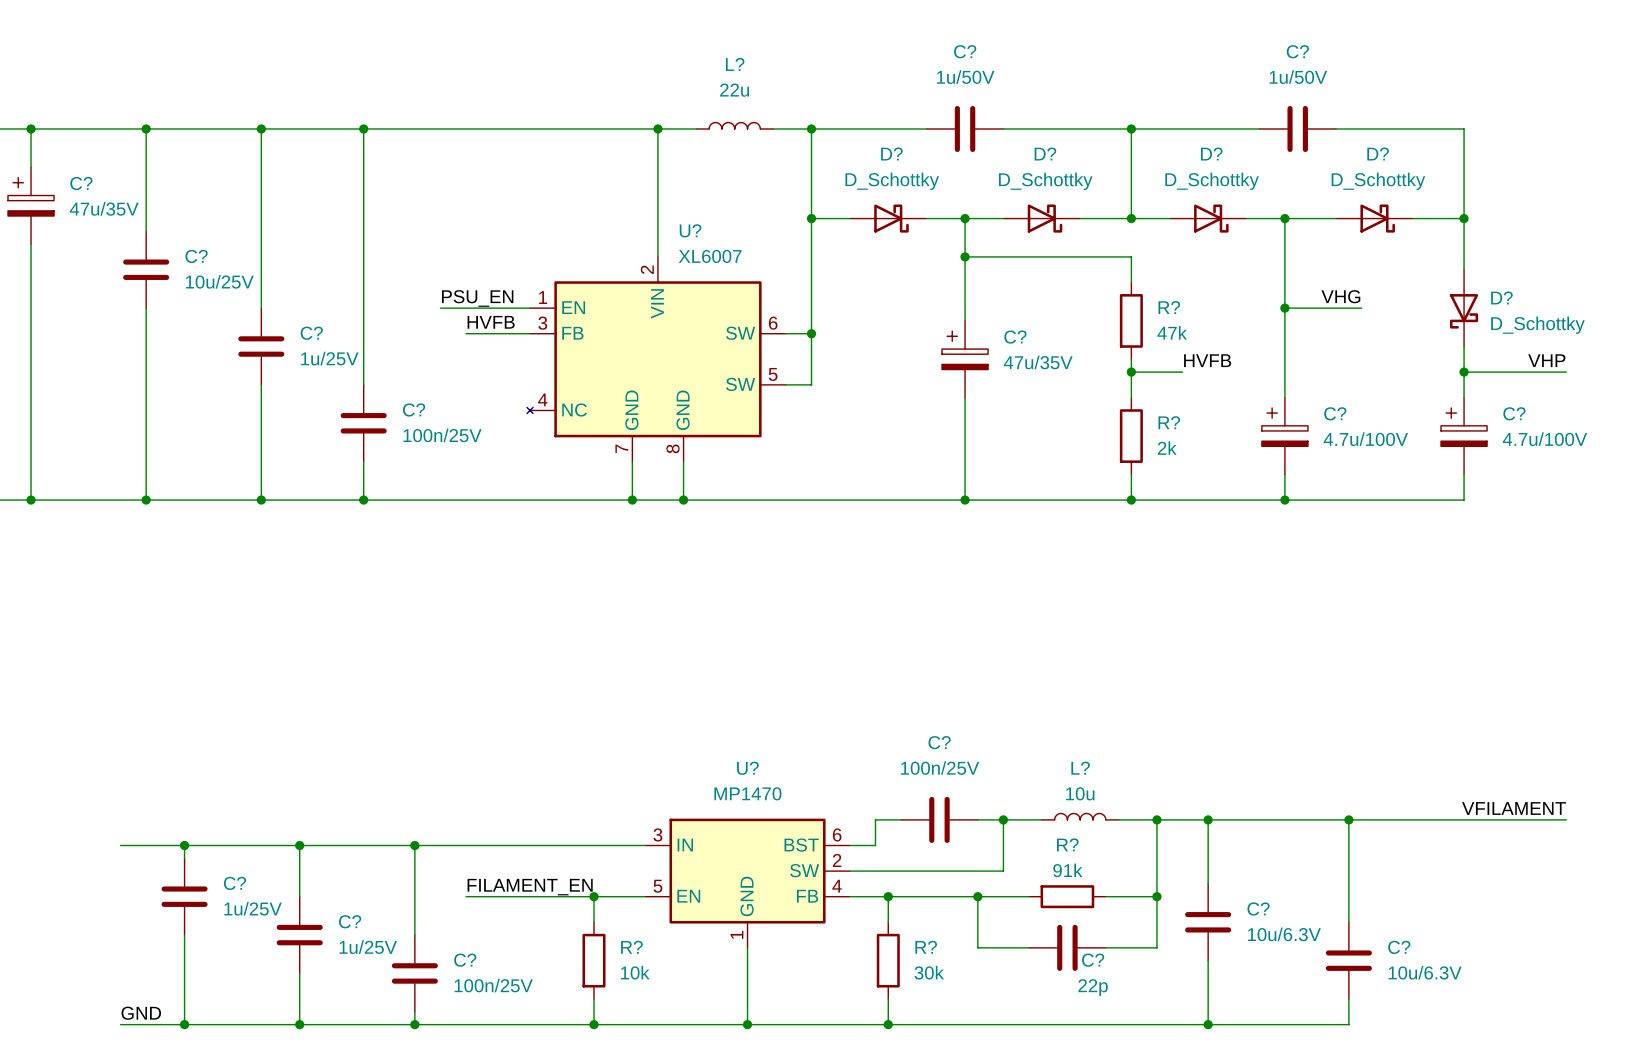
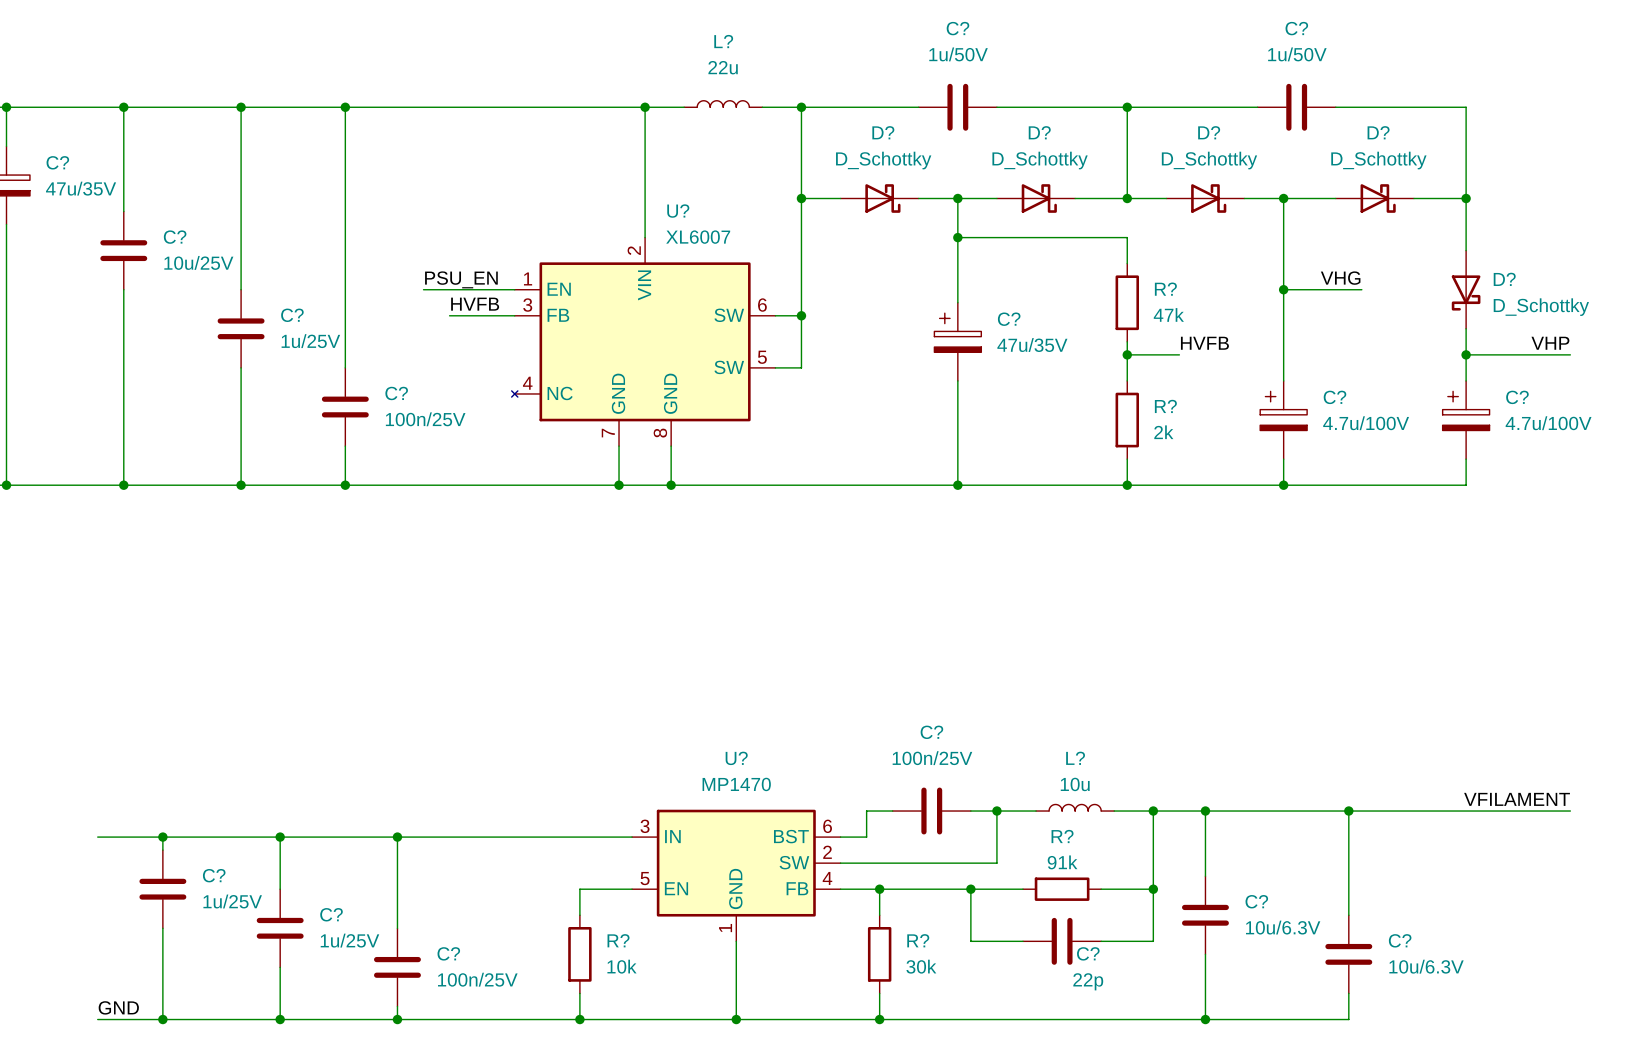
label: FILAMENT_EN (530, 887) -> none
wire: (466, 896) (593, 896) -> none
junction: (593, 896) -> none

